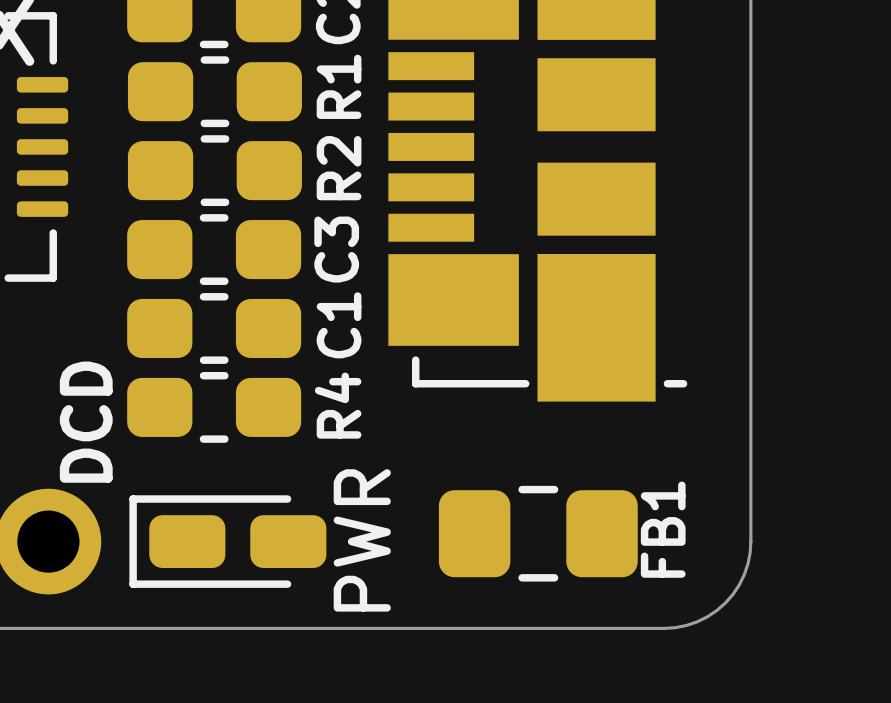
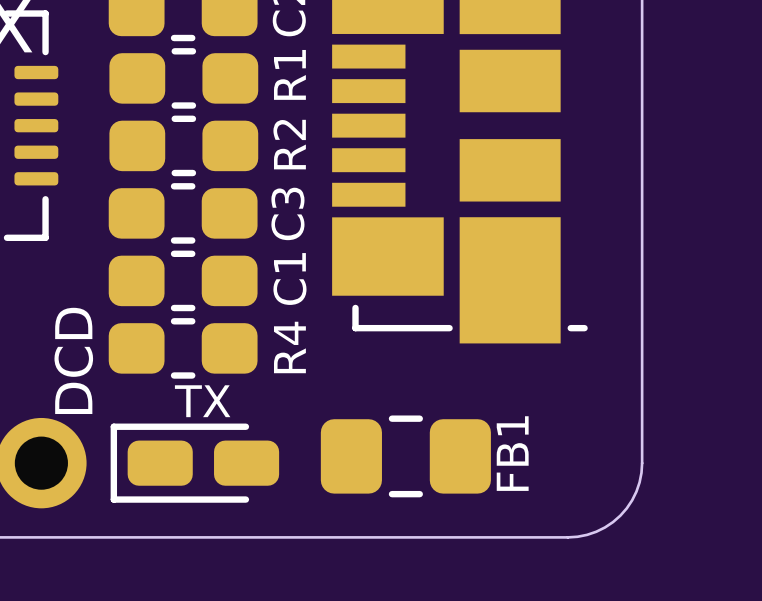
FB1 position: (538, 533) -> (405, 456)
PWR name: PWR (362, 540) -> TX (202, 401)

